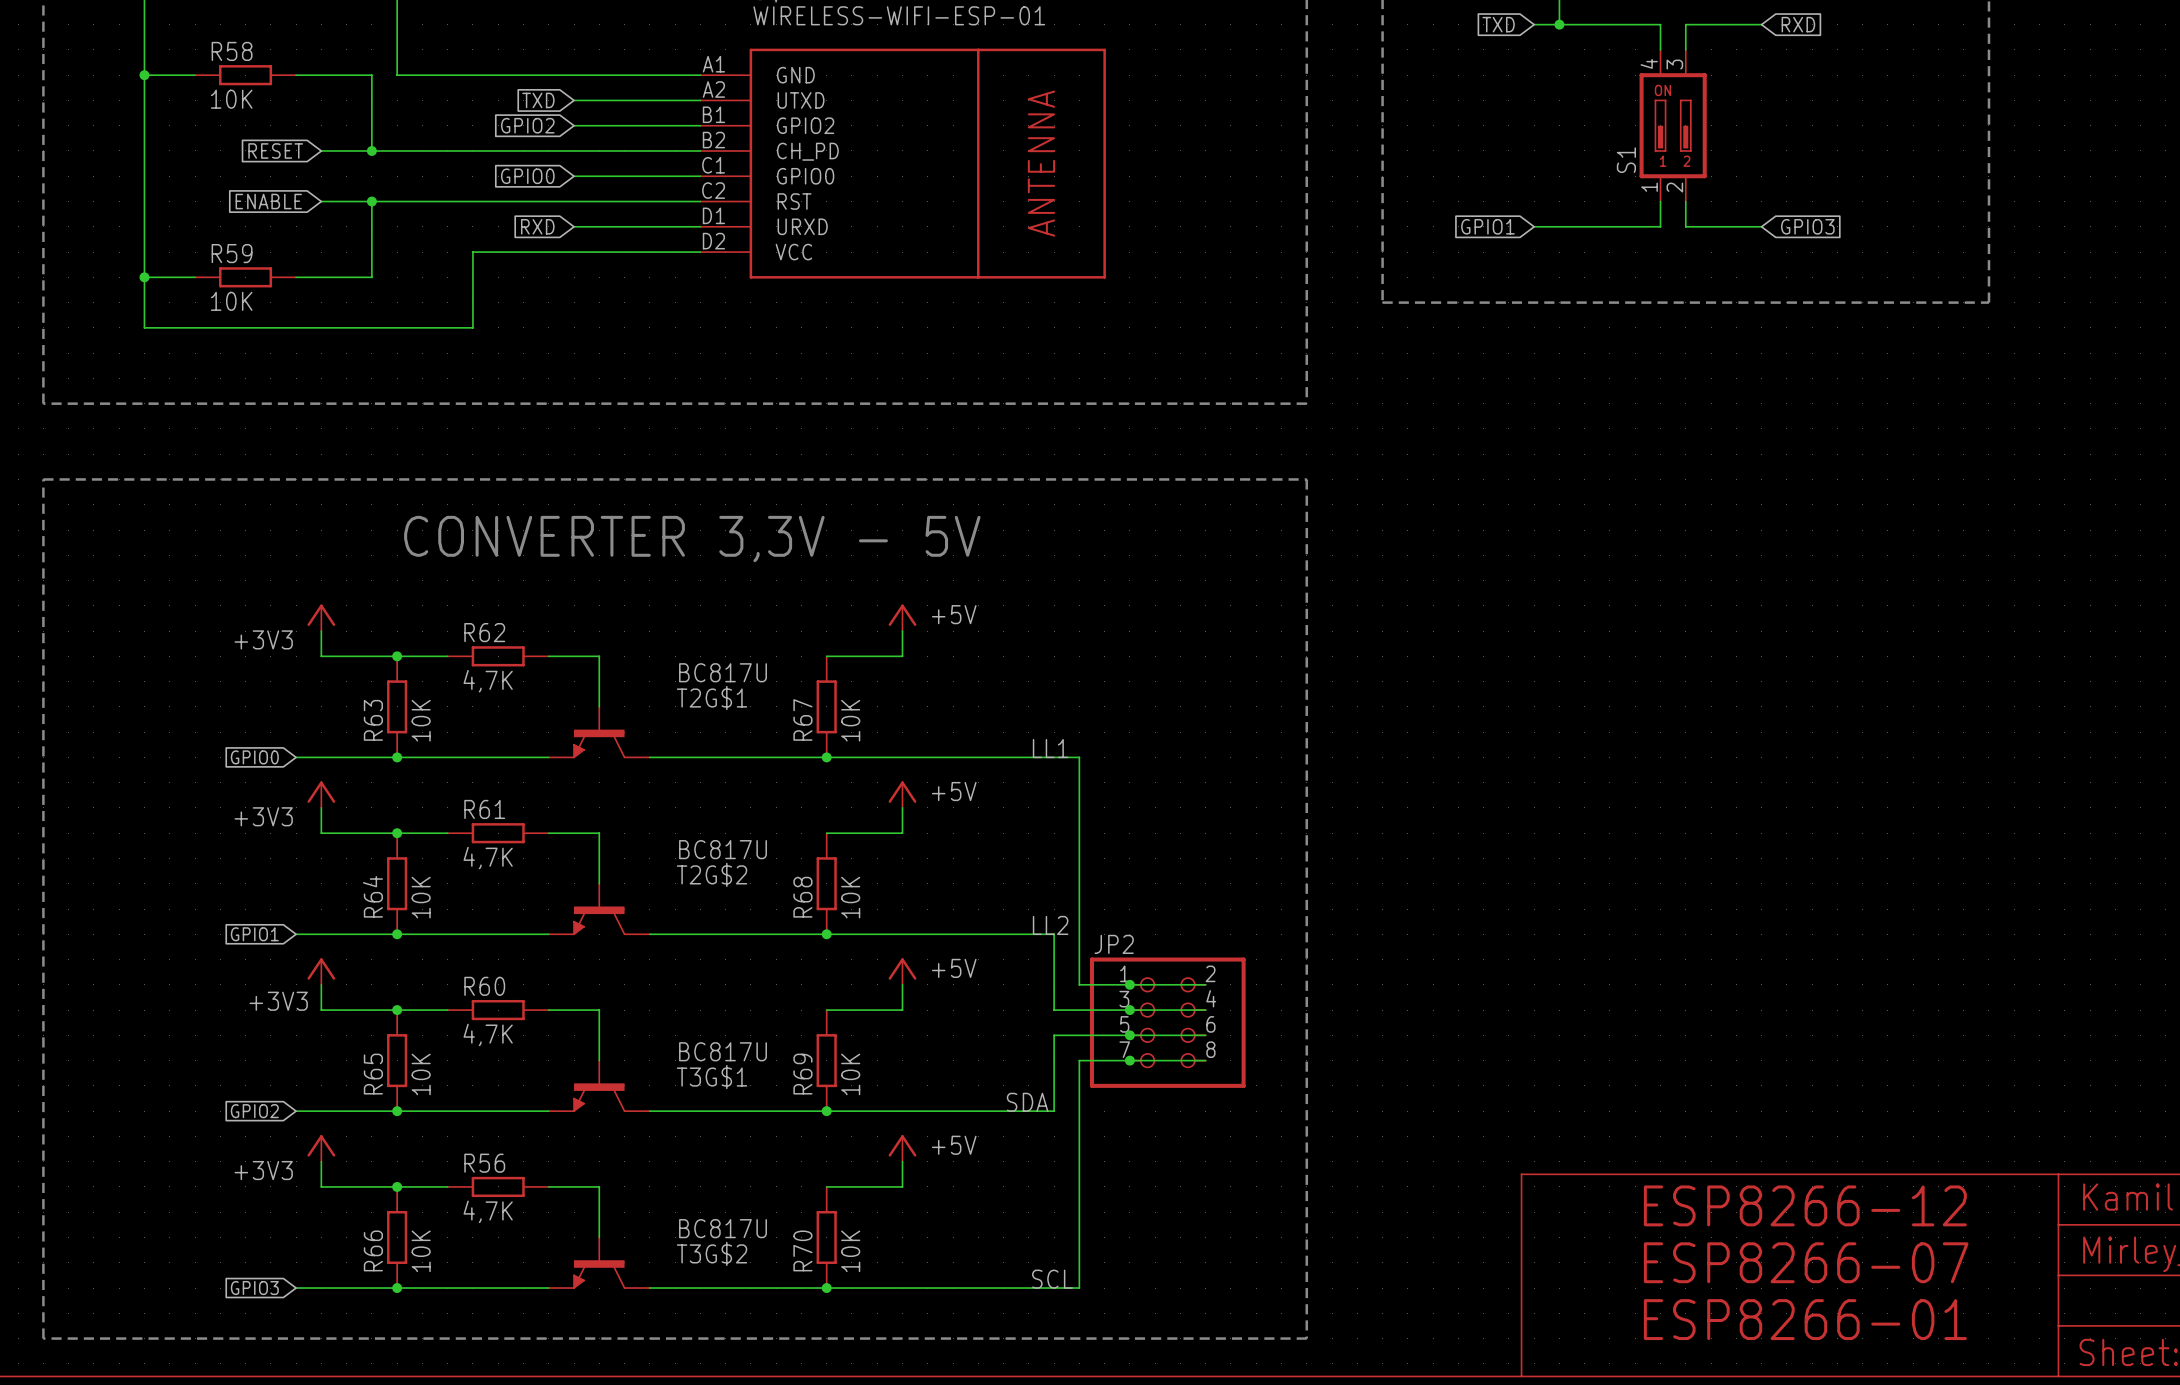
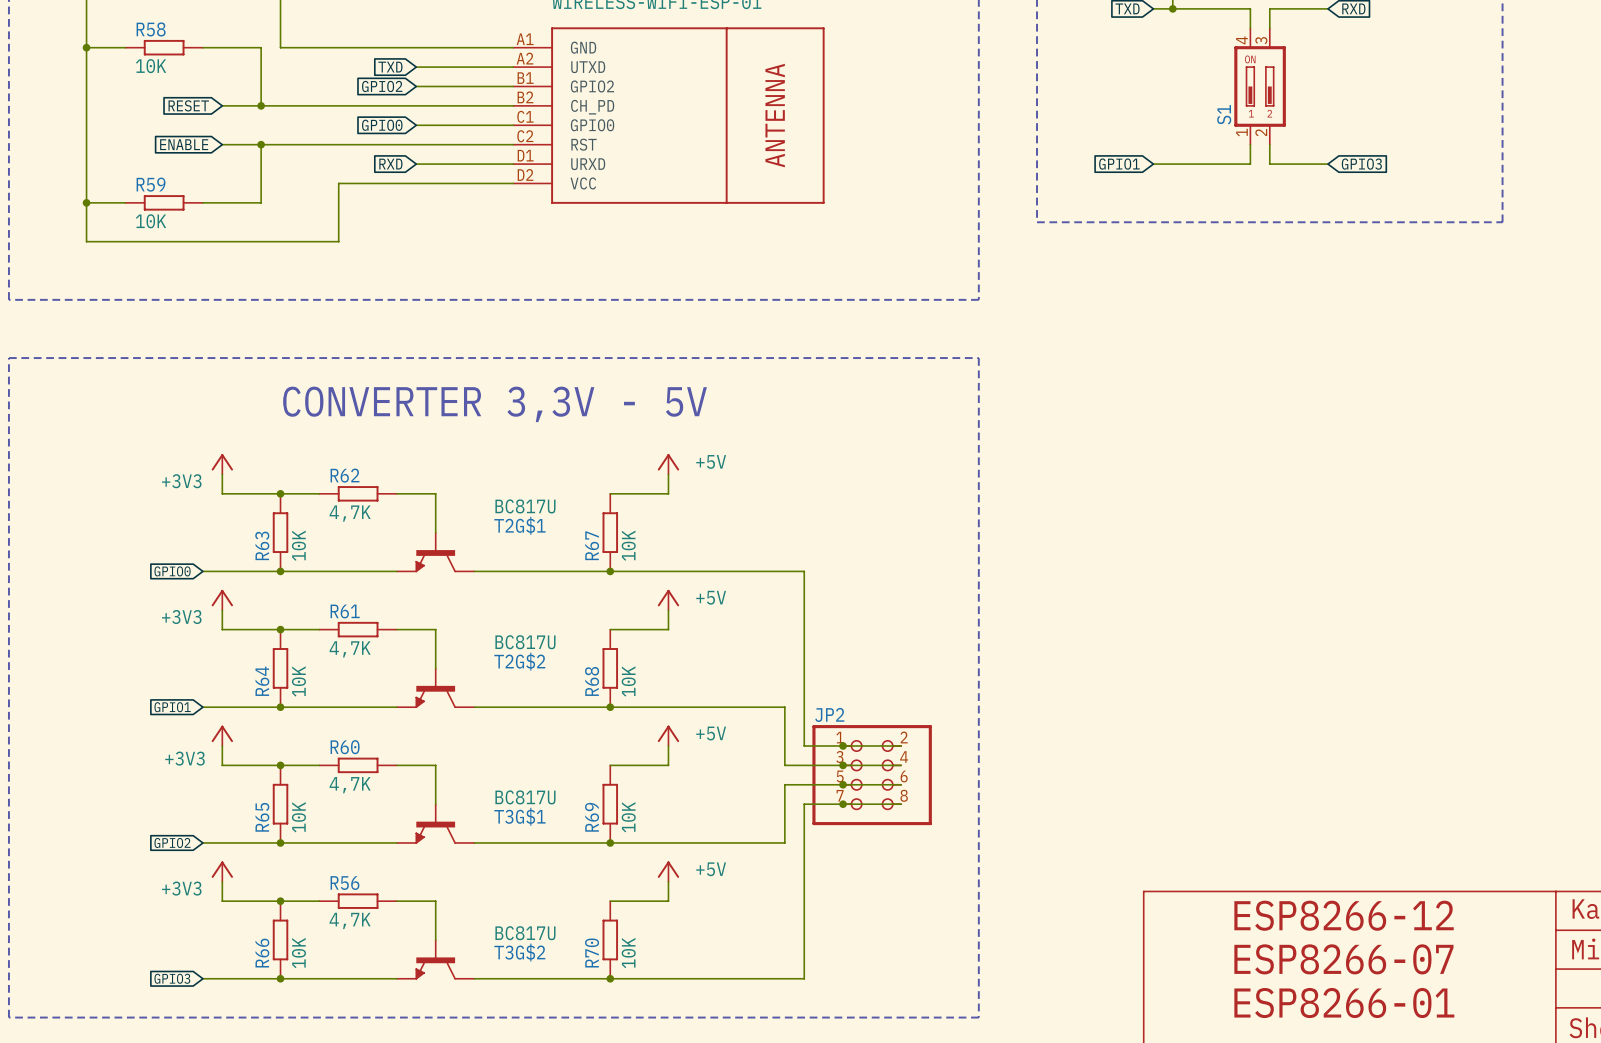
label: LL1 (1050, 748) -> none
label: LL2 (1050, 925) -> none
label: SDA (1027, 1102) -> none
label: SCL (1052, 1279) -> none

